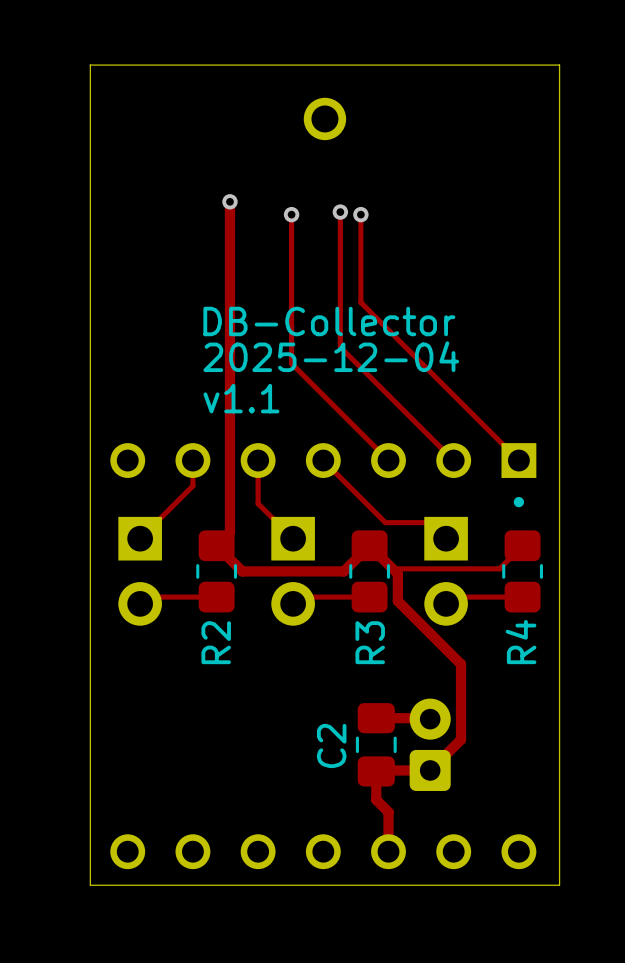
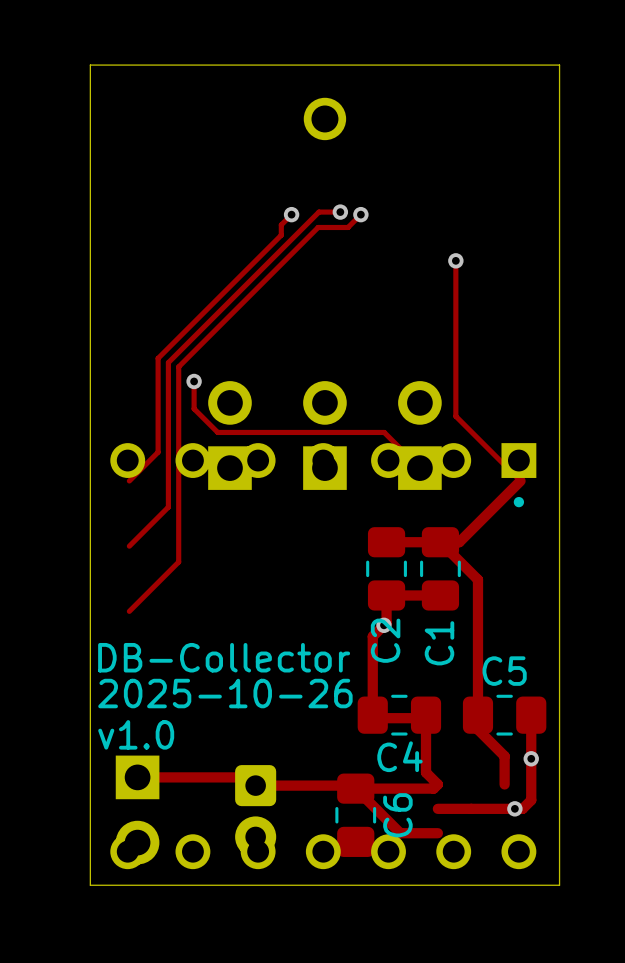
track: (229, 201) (229, 532) (216, 545) (242, 571) (343, 571) (369, 545) -> none
via: (229, 201) -> none
track: (340, 212) (340, 347) (453, 460) -> (340, 212) (318, 212) (168, 362) (168, 507) (129, 546)
track: (291, 214) (291, 363) (388, 460) -> (291, 214) (281, 224) (281, 235) (158, 358) (158, 452) (129, 480)
track: (360, 214) (360, 302) (518, 460) -> (360, 214) (348, 227) (318, 227) (178, 366) (178, 562) (129, 611)
track: none -> (455, 260) (455, 416) (520, 480) (459, 542) (386, 542)
via: none -> (455, 260)
text position: DB-Collector (329, 321) -> DB-Collector (224, 657)
text: 2025-12-04 (331, 356) -> none
track: none -> (194, 381) (194, 408) (217, 432) (384, 432) (419, 468)
via: none -> (194, 381)
text: v1.1 (241, 398) -> none
part: none -> (229, 435)
part: none -> (324, 435)
part: none -> (419, 435)
track: (192, 460) (192, 485) (140, 538) -> none
track: (258, 460) (258, 503) (293, 538) -> none
track: (323, 460) (385, 522) (430, 522) (446, 538) -> none
track: none -> (440, 542) (477, 579) (477, 729) (504, 756) (504, 784)
track: (369, 545) (392, 568) (499, 568) (522, 545) -> none
track: (369, 545) (397, 574) (397, 601) (461, 664) (461, 739) (430, 770) (376, 771) (376, 799) (388, 812) (388, 851) -> none
C1: none -> (440, 568)
part: (140, 571) -> none
R2: (216, 571) -> none
part: (293, 571) -> none
R3: (369, 571) -> none
part: (446, 571) -> none
R4: (522, 571) -> none
track: none -> (440, 595) (386, 595) (386, 622) (372, 636) (372, 715)
track: (216, 597) (146, 597) (140, 603) -> none
track: (369, 597) (299, 597) (293, 603) -> none
track: (522, 597) (452, 597) (446, 603) -> none
via: none -> (383, 625)
text: none -> 2025-10-26 (225, 693)
C4: none -> (399, 715)
track: none -> (426, 715) (426, 772) (437, 784)
C5: none -> (504, 715)
track: none -> (531, 715) (531, 800) (522, 808) (437, 808)
text: none -> v1.0 (136, 734)
C2 position: (376, 744) -> (386, 568)
part rotation: 0° (430, 744) -> 180° (255, 811)
part position: (430, 744) -> (255, 811)
C2 name position: C2 (331, 745) -> C2 (385, 640)
via: none -> (531, 758)
track: none -> (137, 777) (247, 777) (255, 785) (352, 785) (400, 833) (437, 833)
track: none -> (437, 784) (433, 788) (355, 788)
via: none -> (514, 808)
part: none -> (137, 810)
C6: none -> (355, 815)

